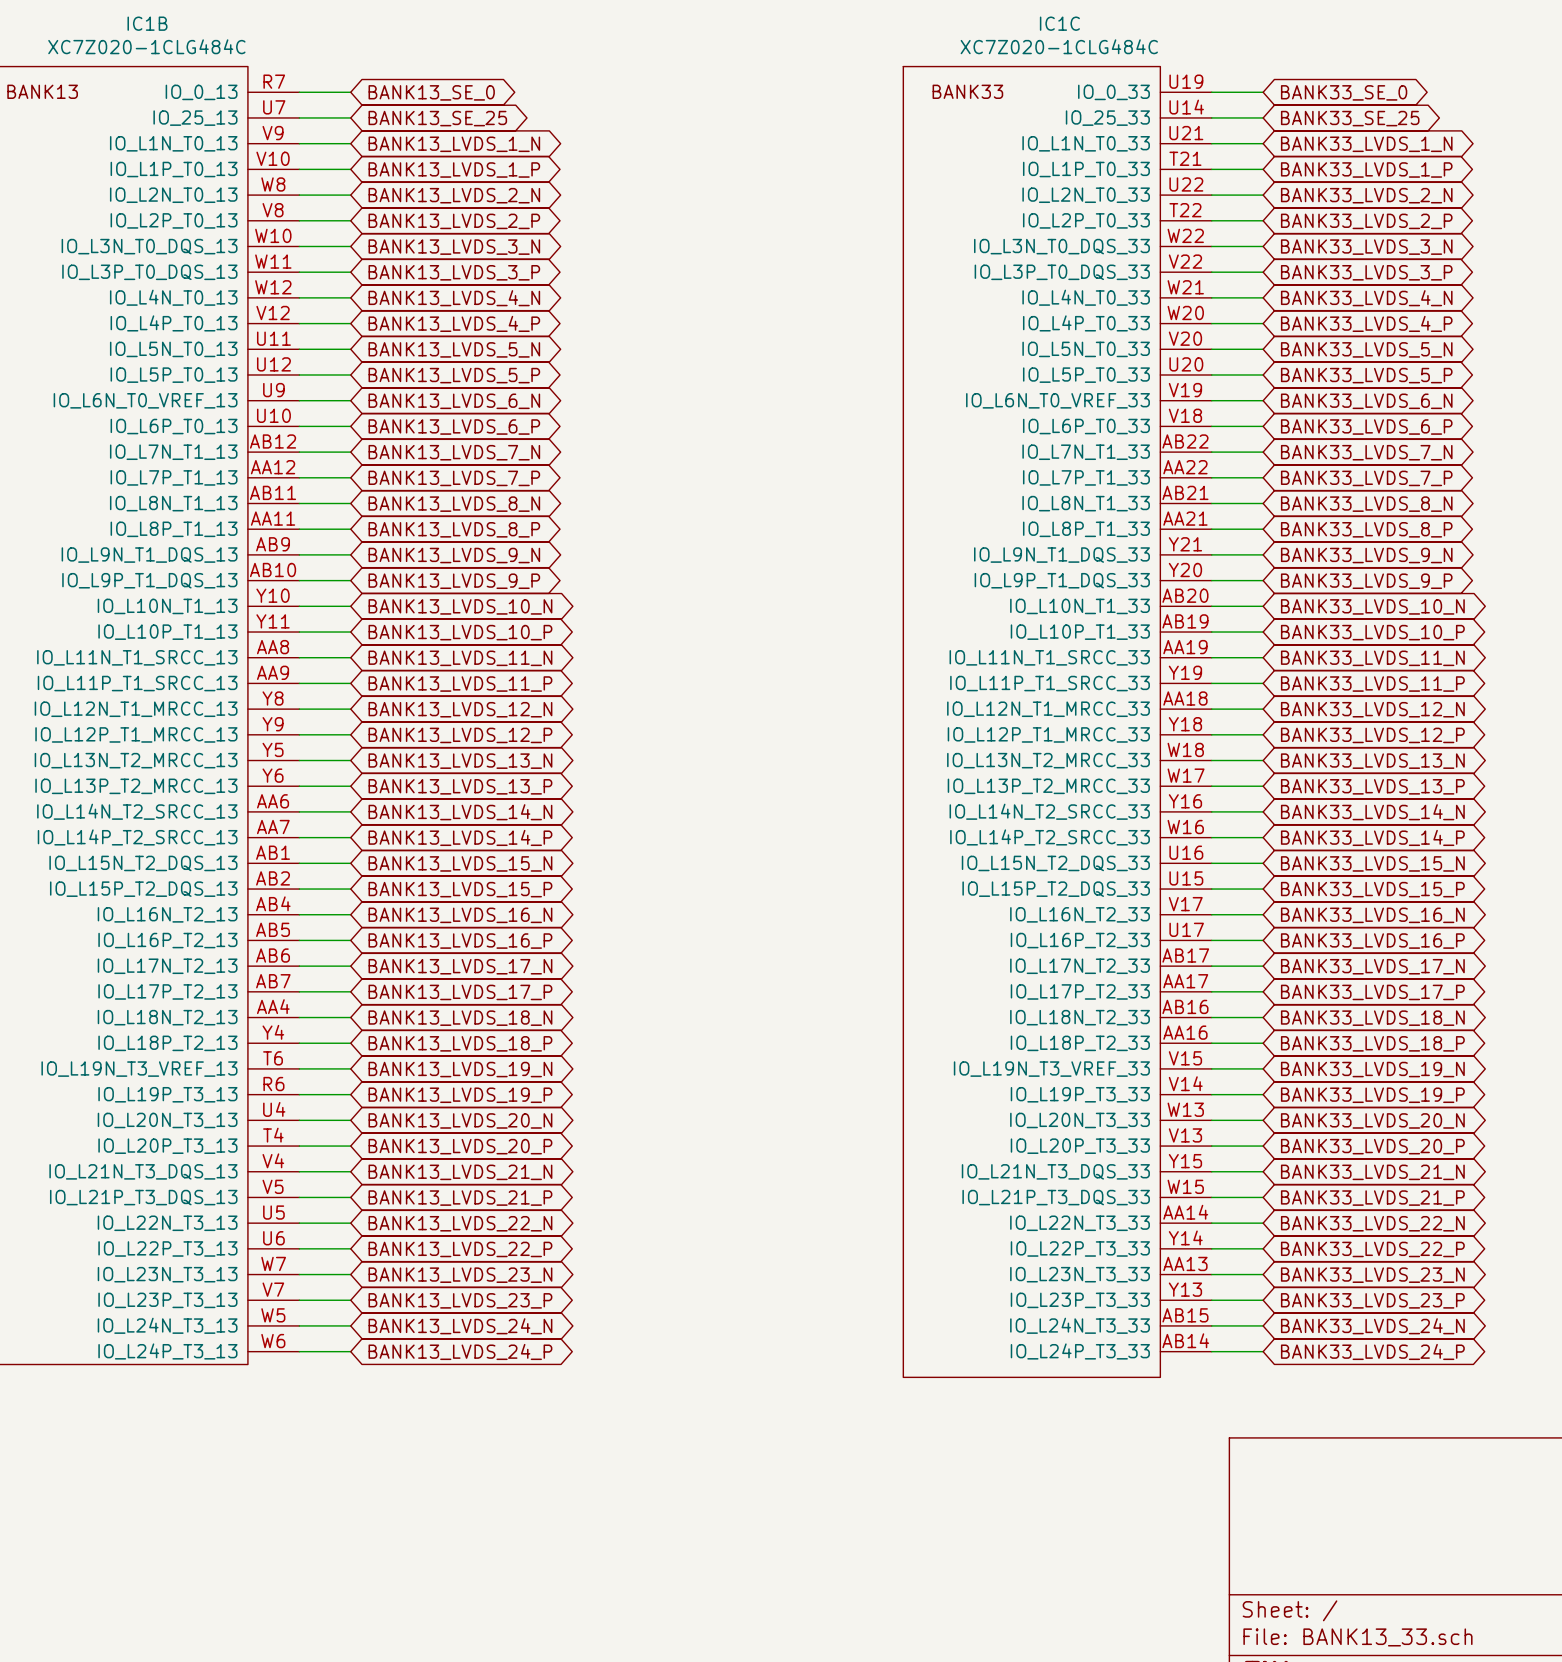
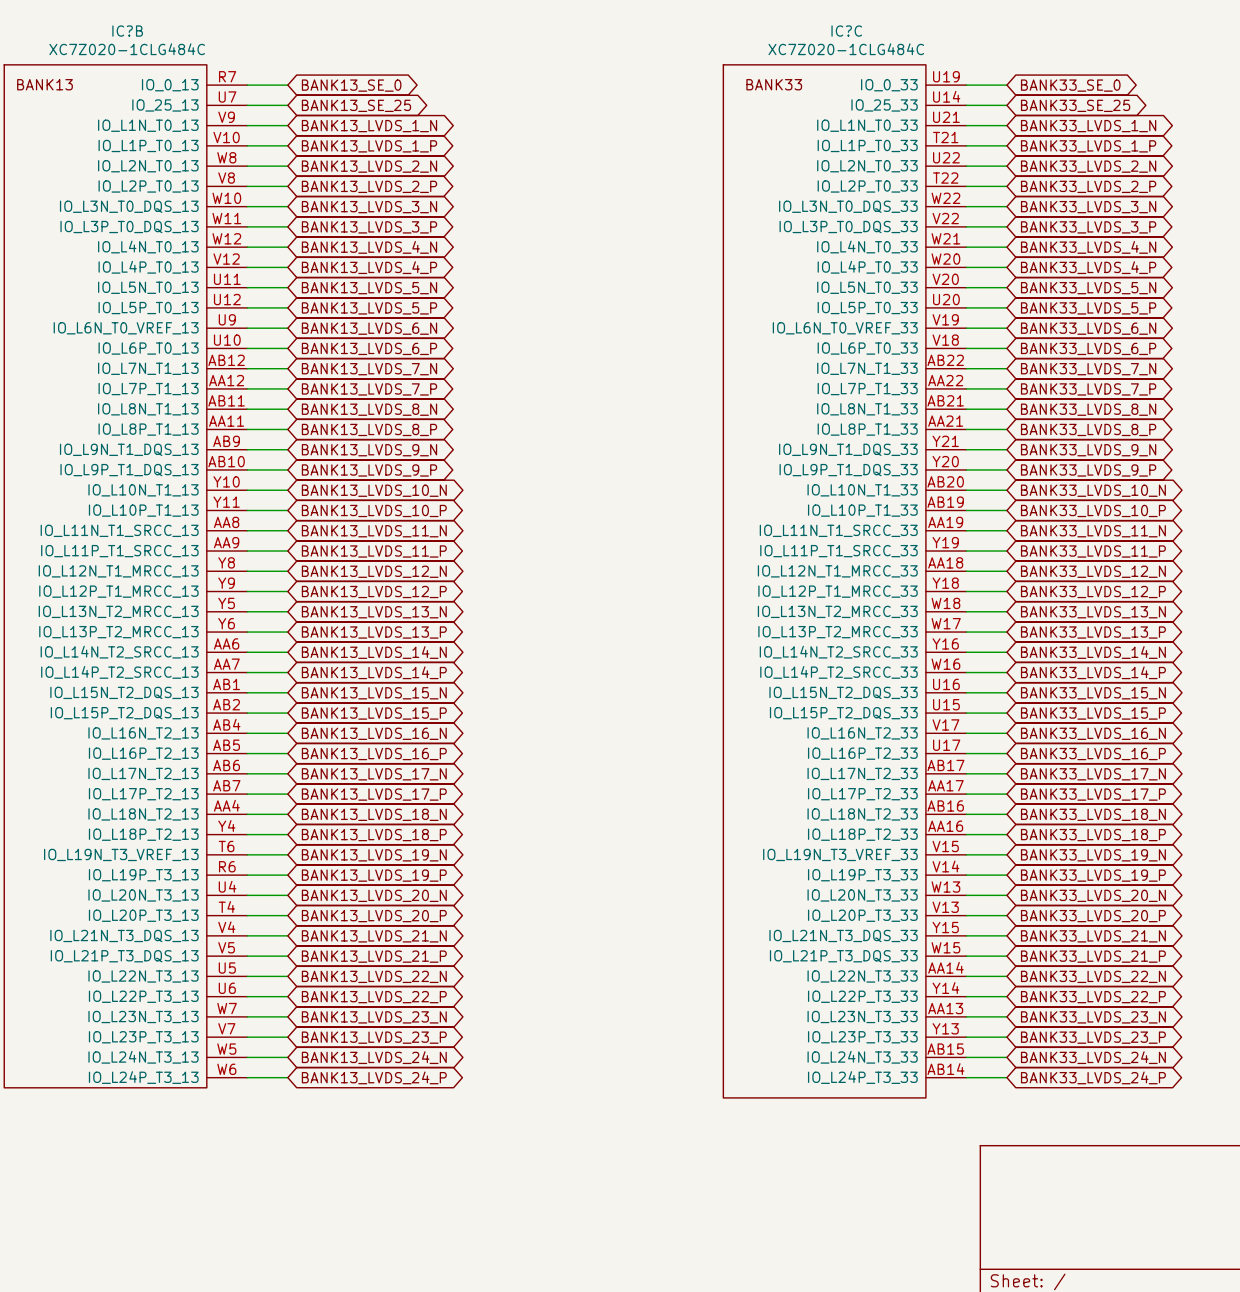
IC1B name: IC1B (147, 23) -> IC?B (127, 31)
IC1C name: IC1C (1059, 23) -> IC?C (846, 31)

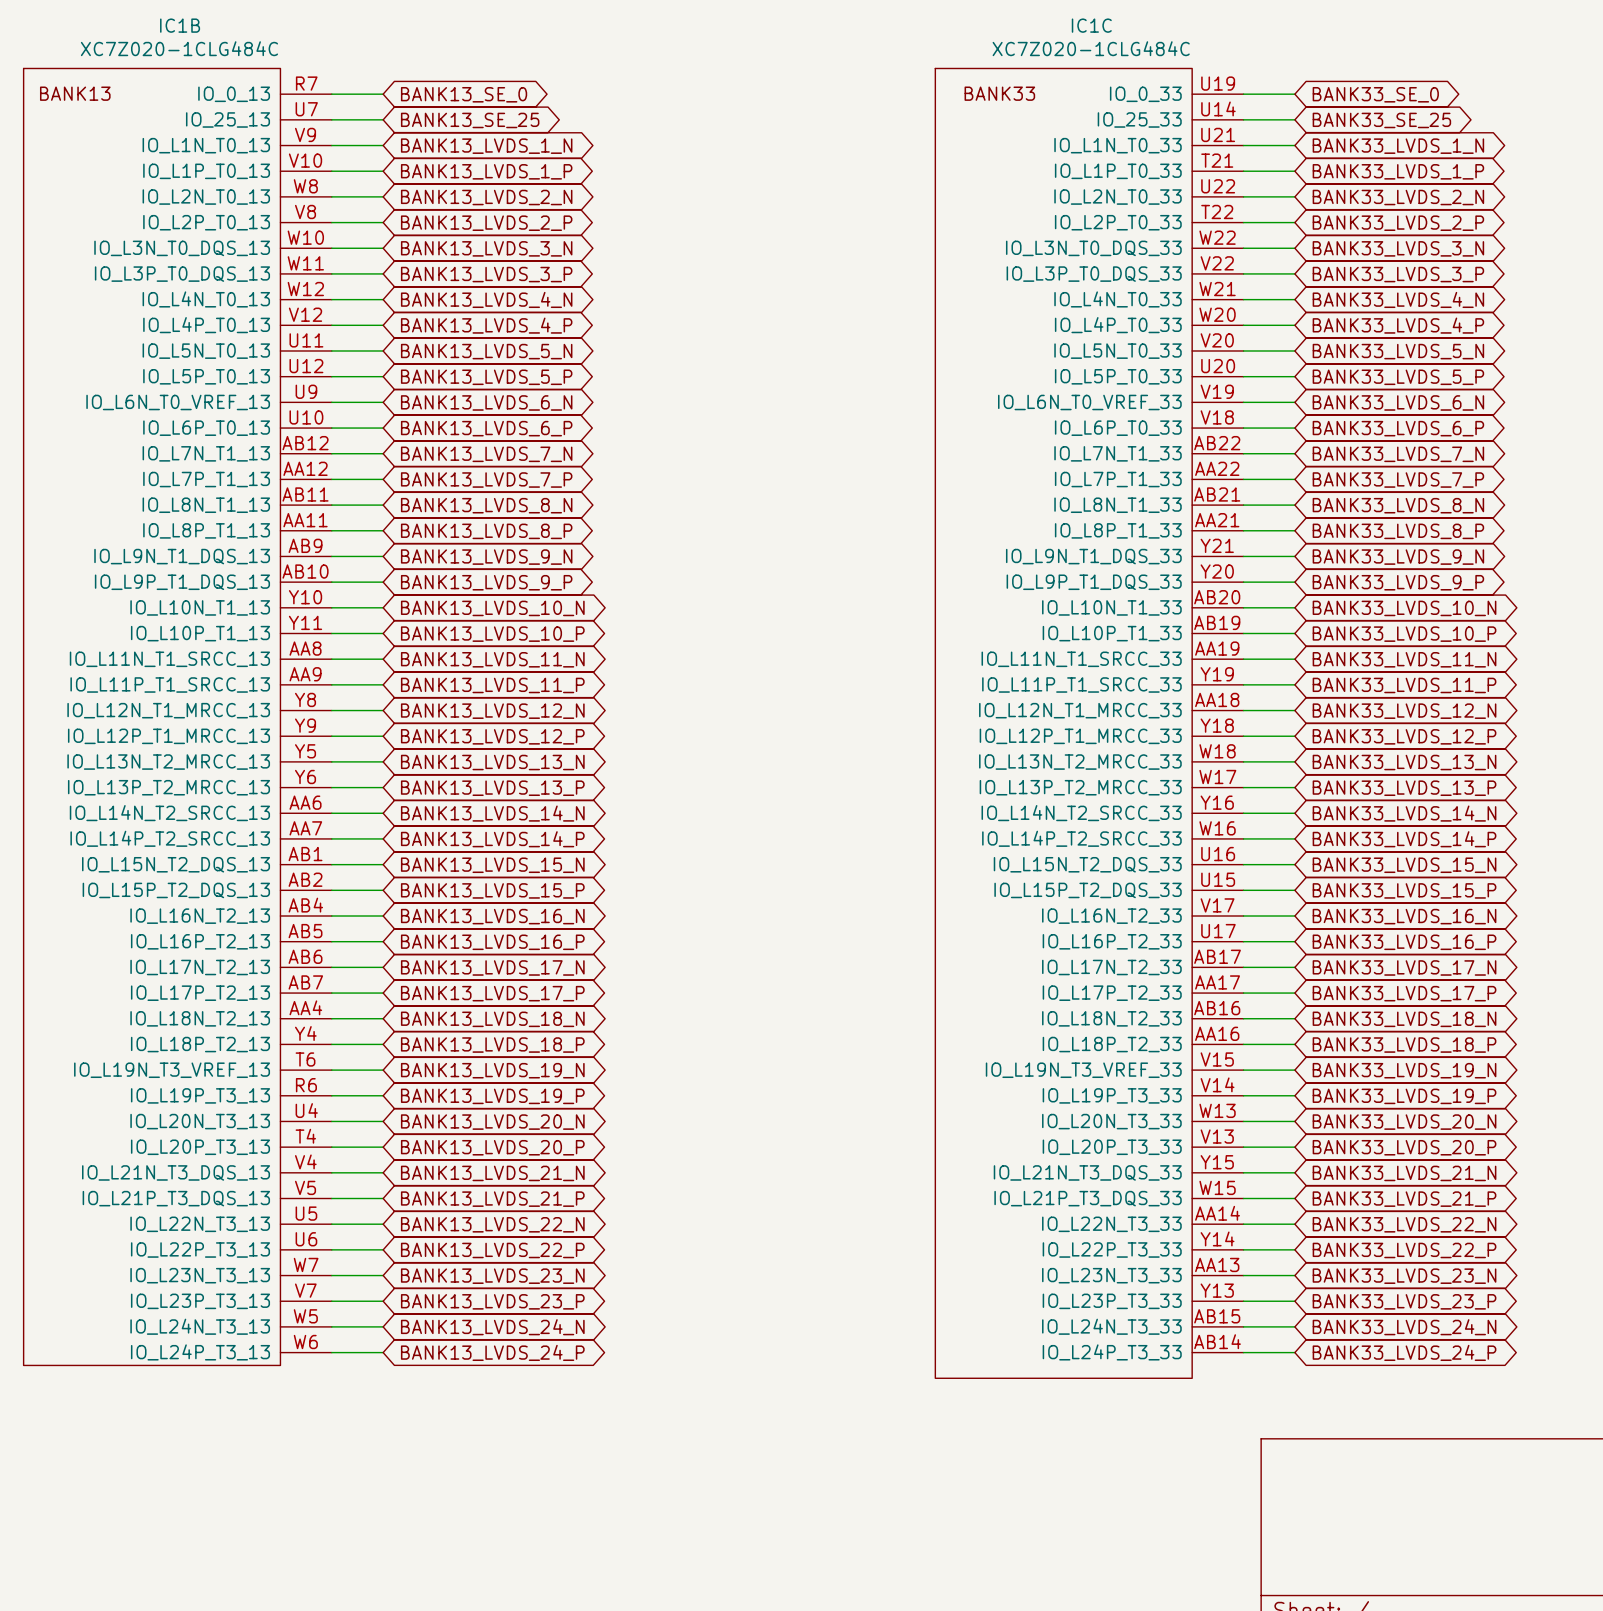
IC?B name: IC?B (127, 31) -> IC1B (180, 25)
IC?C name: IC?C (846, 31) -> IC1C (1091, 25)

